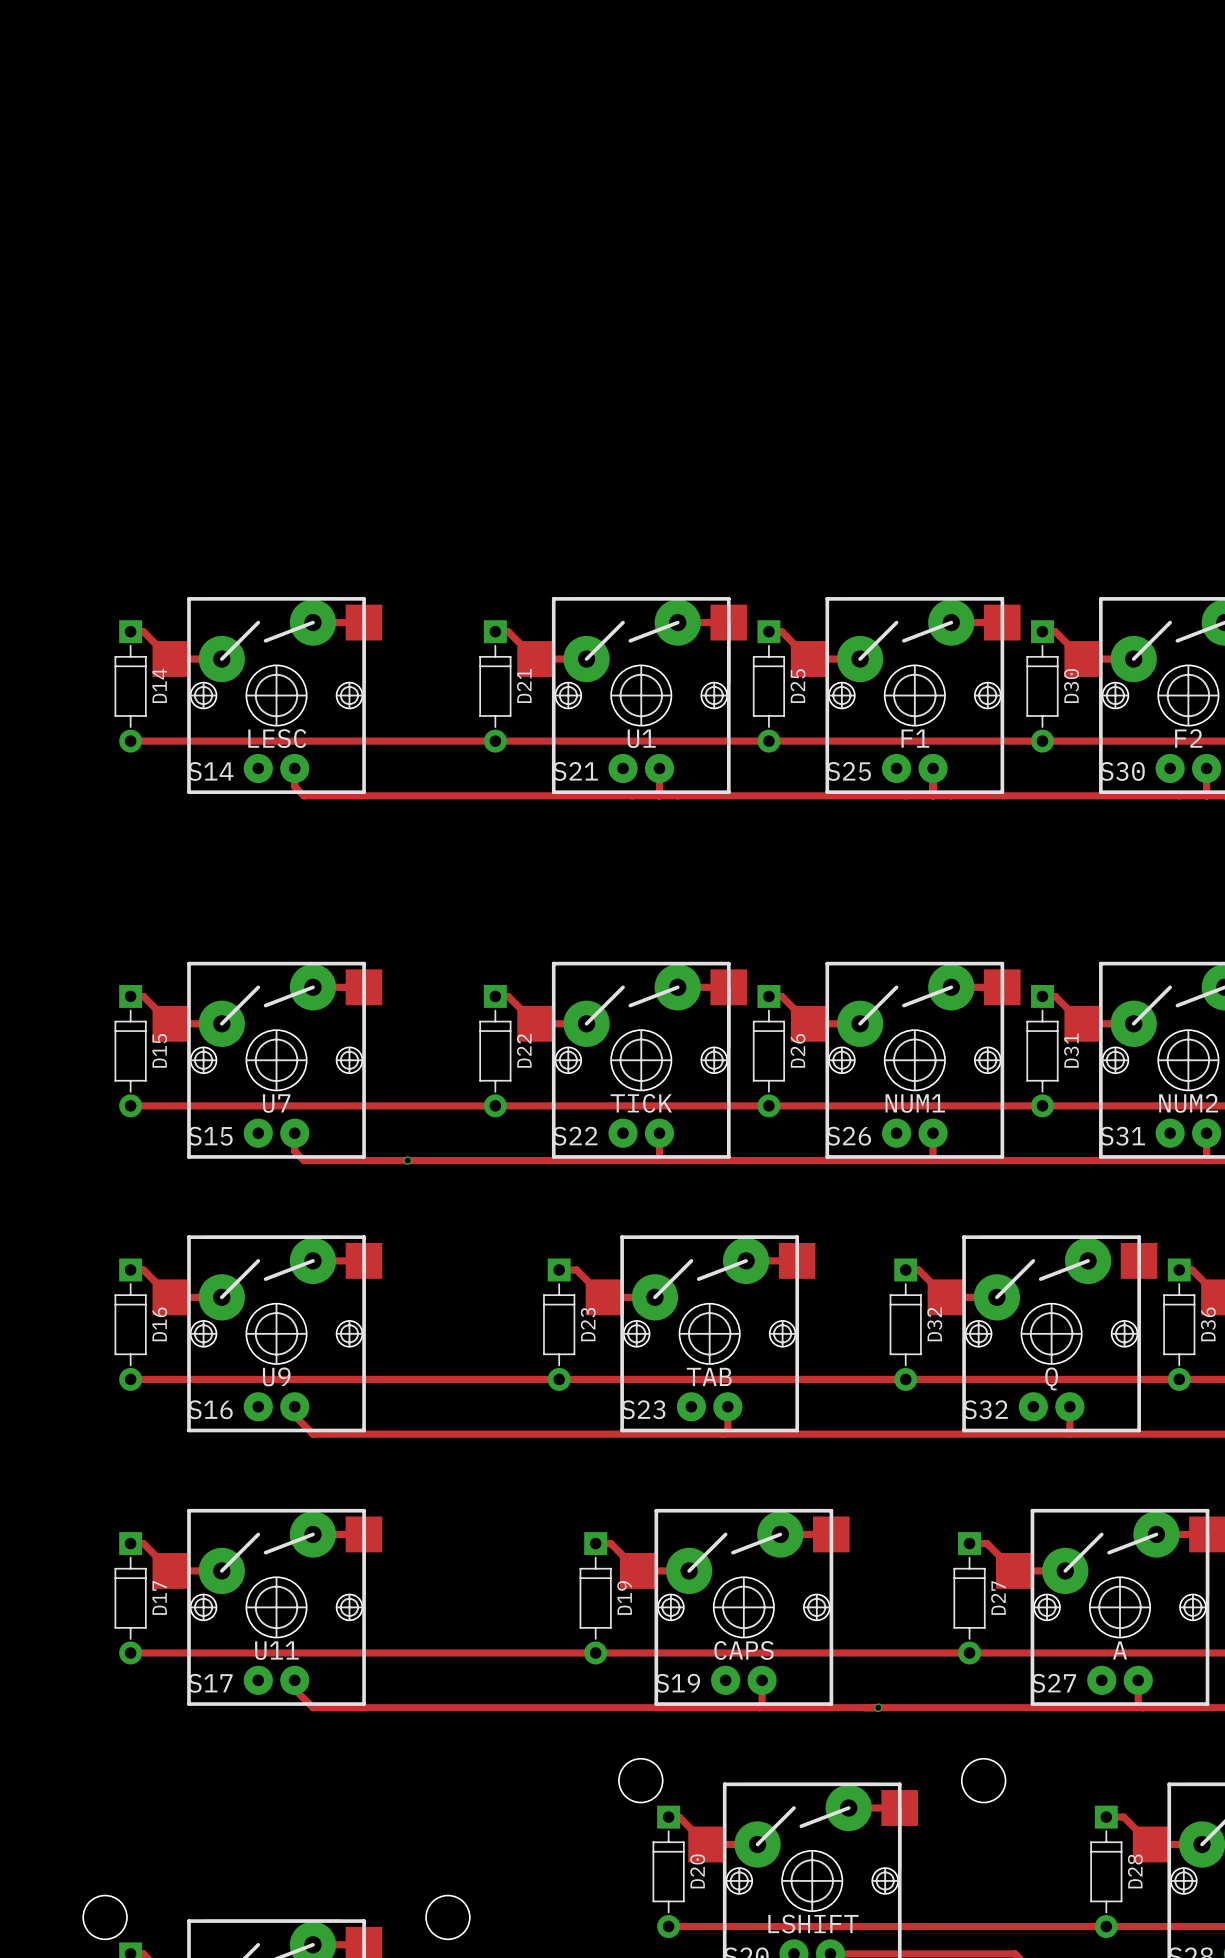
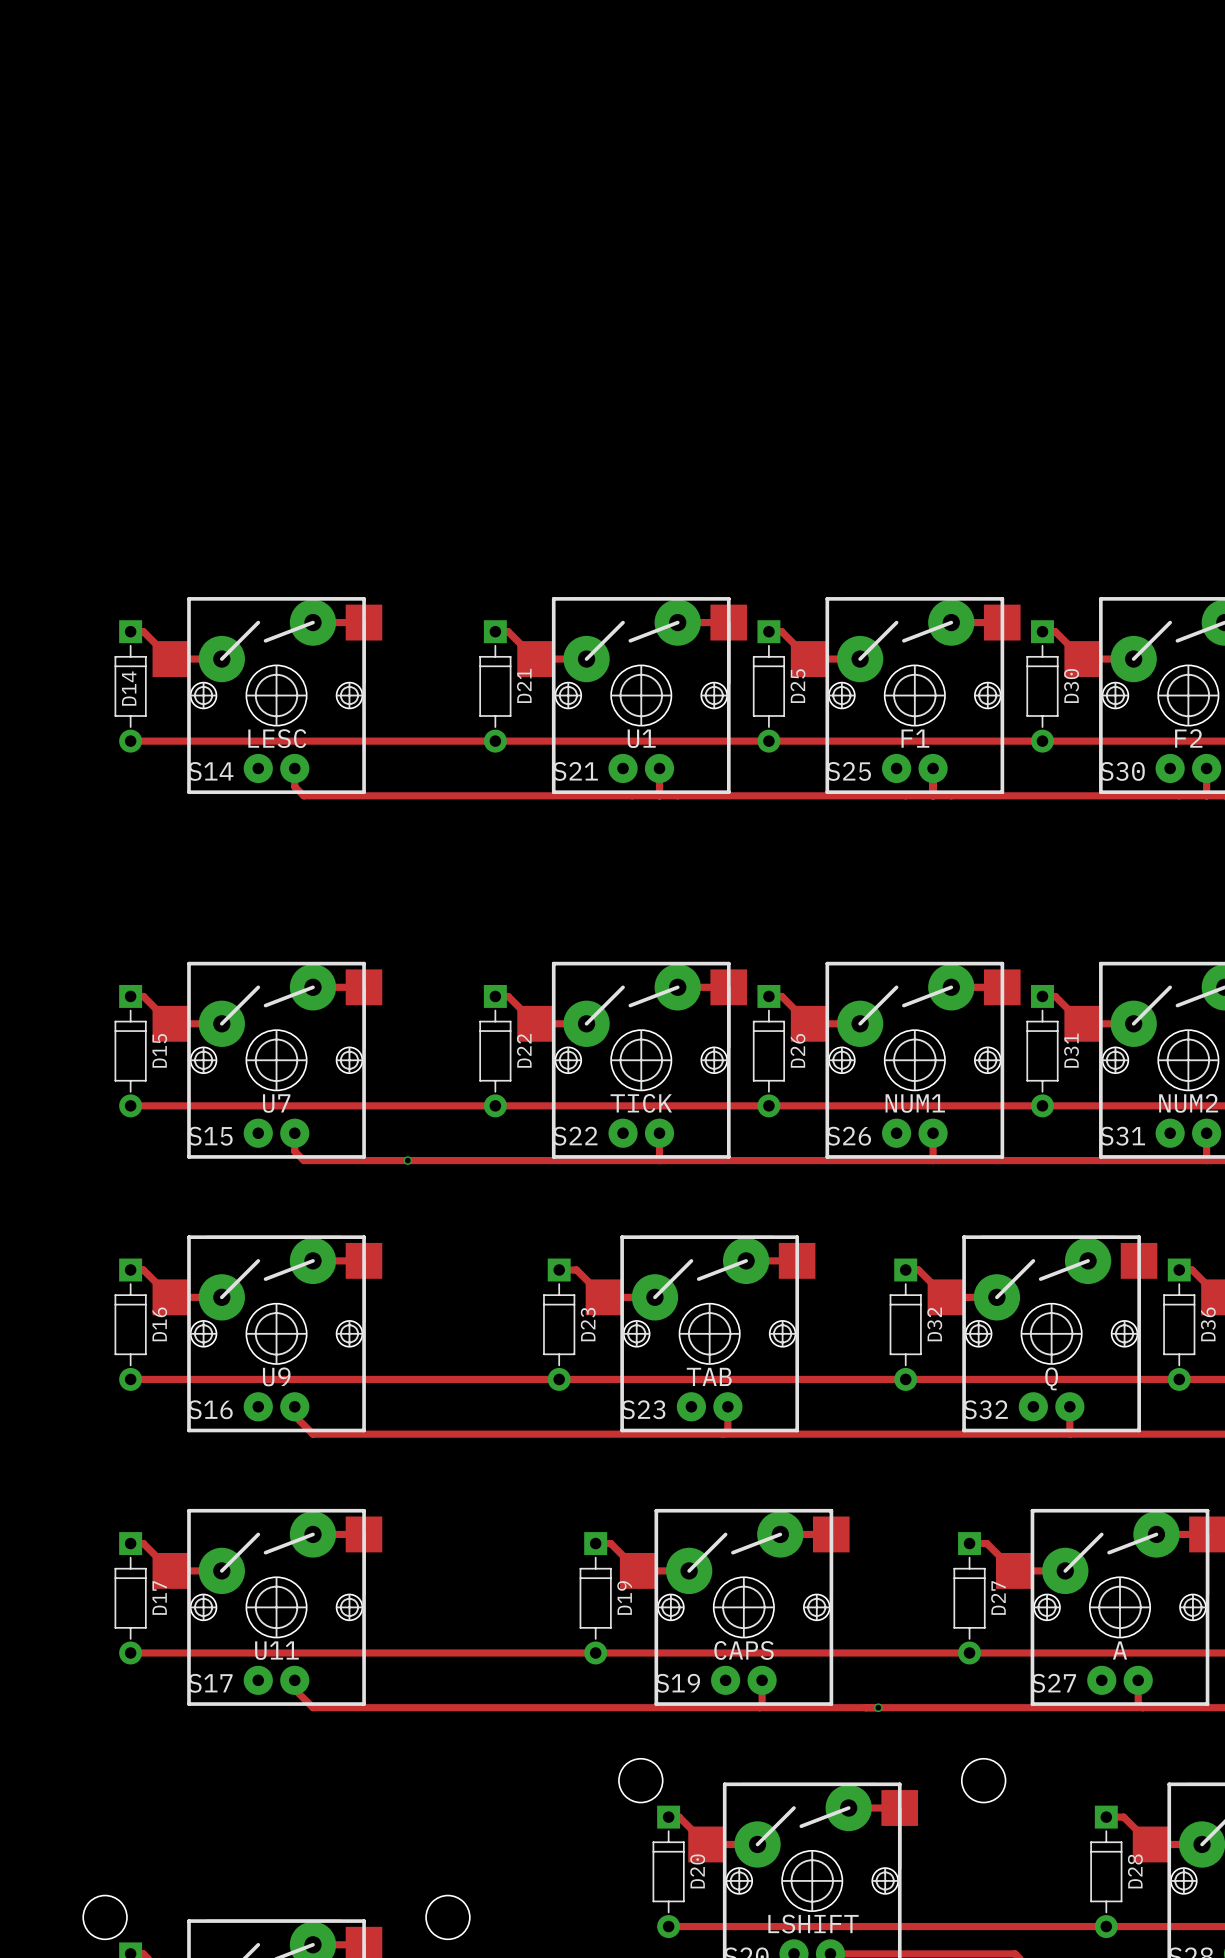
D14 name position: D14 (159, 685) -> D14 (129, 688)

